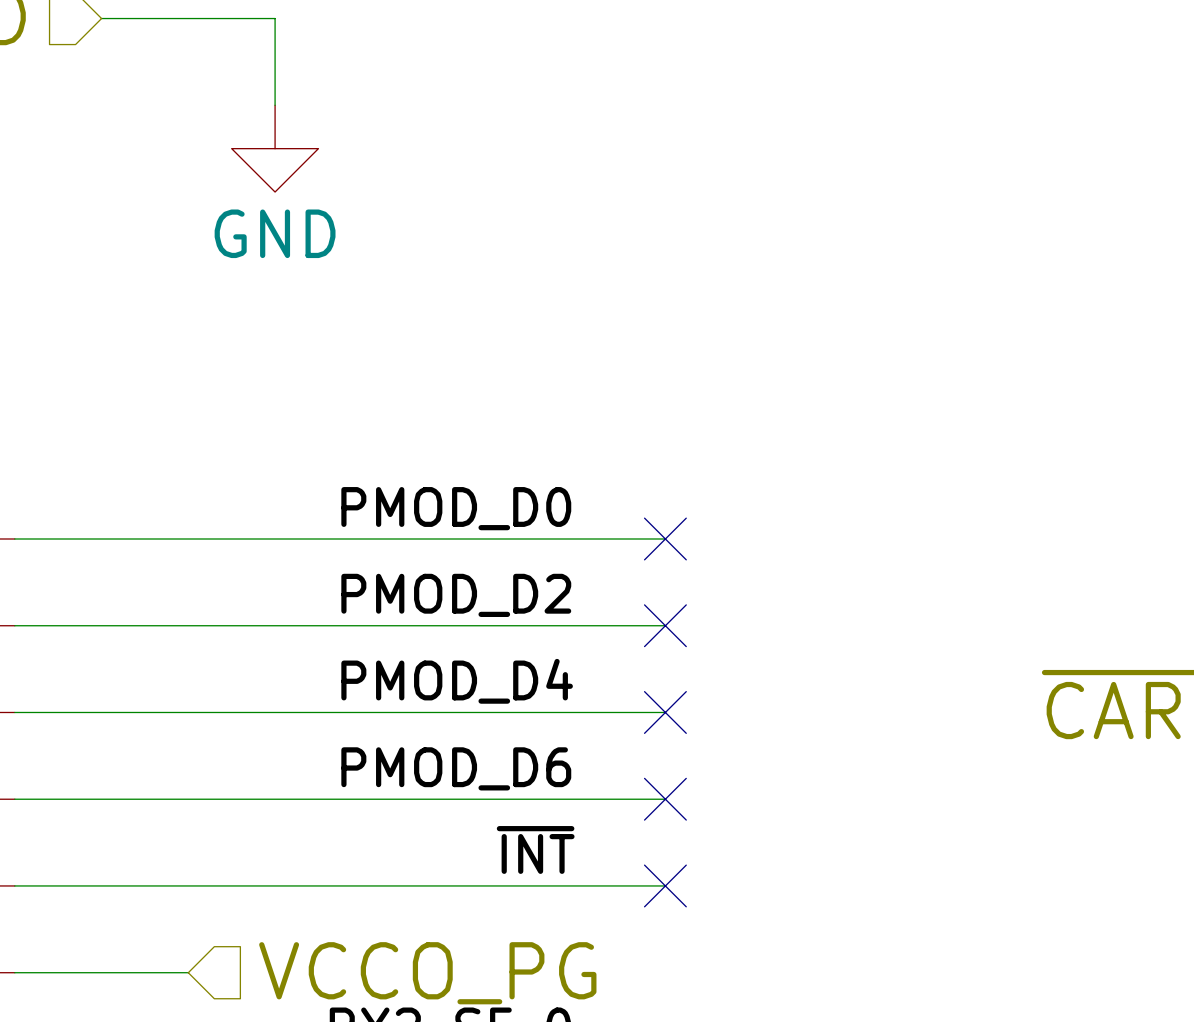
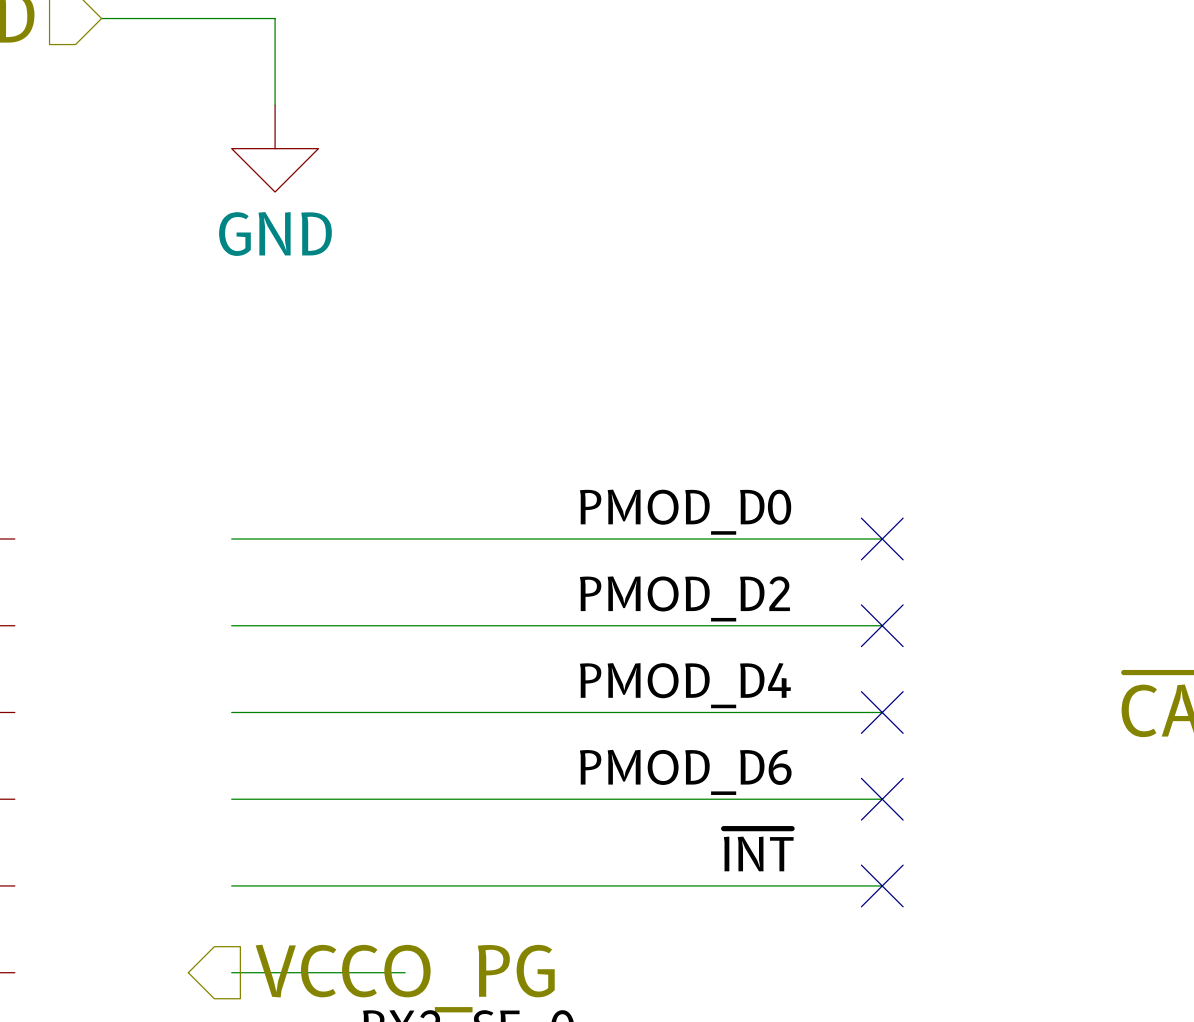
label position: PMOD_D0 (456, 508) -> PMOD_D0 (685, 512)
wire: (14, 538) (231, 538) -> (665, 538) (882, 538)
no-connect mark: (665, 538) -> none
no-connect mark: none -> (882, 538)
label position: PMOD_D2 (456, 595) -> PMOD_D2 (684, 598)
wire: (14, 625) (231, 625) -> (665, 625) (882, 625)
no-connect mark: (665, 625) -> none
no-connect mark: none -> (882, 625)
label position: PMOD_D4 (457, 681) -> PMOD_D4 (685, 685)
wire: (14, 712) (231, 712) -> (665, 712) (882, 712)
no-connect mark: (665, 712) -> none
no-connect mark: none -> (882, 712)
label position: PMOD_D6 (456, 768) -> PMOD_D6 (685, 772)
wire: (14, 799) (231, 799) -> (665, 799) (882, 799)
no-connect mark: (665, 799) -> none
no-connect mark: none -> (882, 799)
label position: ~{INT} (535, 849) -> ~{INT} (758, 849)
wire: (14, 885) (231, 885) -> (665, 885) (882, 885)
no-connect mark: (665, 885) -> none
no-connect mark: none -> (882, 885)
wire: (14, 972) (188, 972) -> (231, 972) (405, 972)

